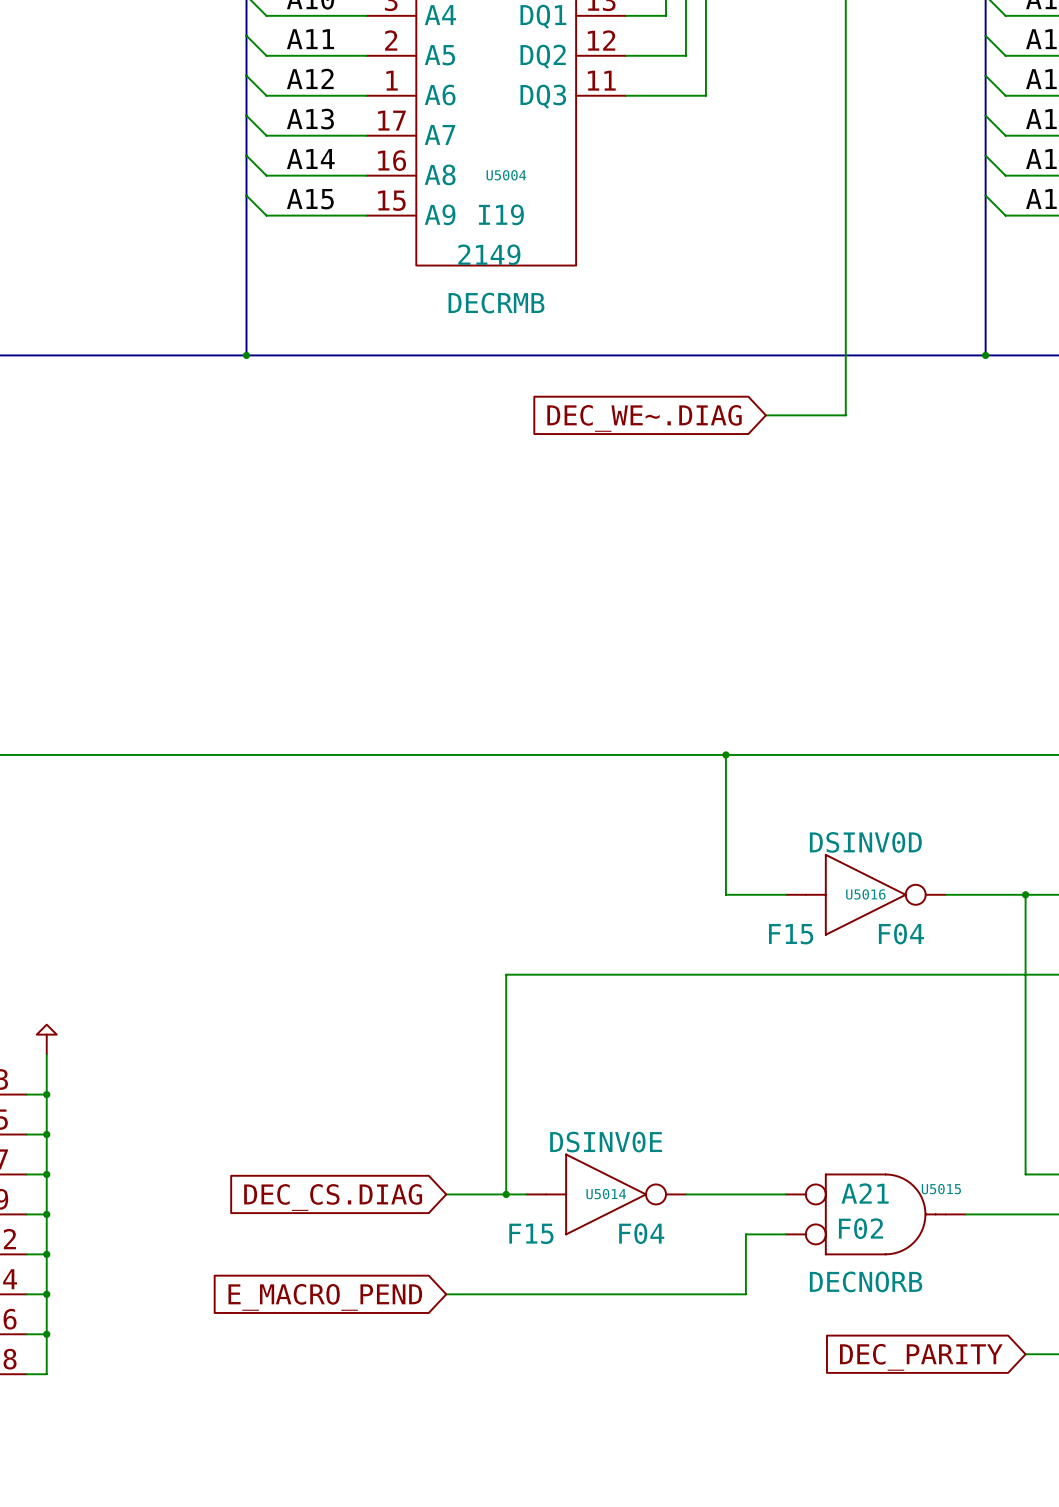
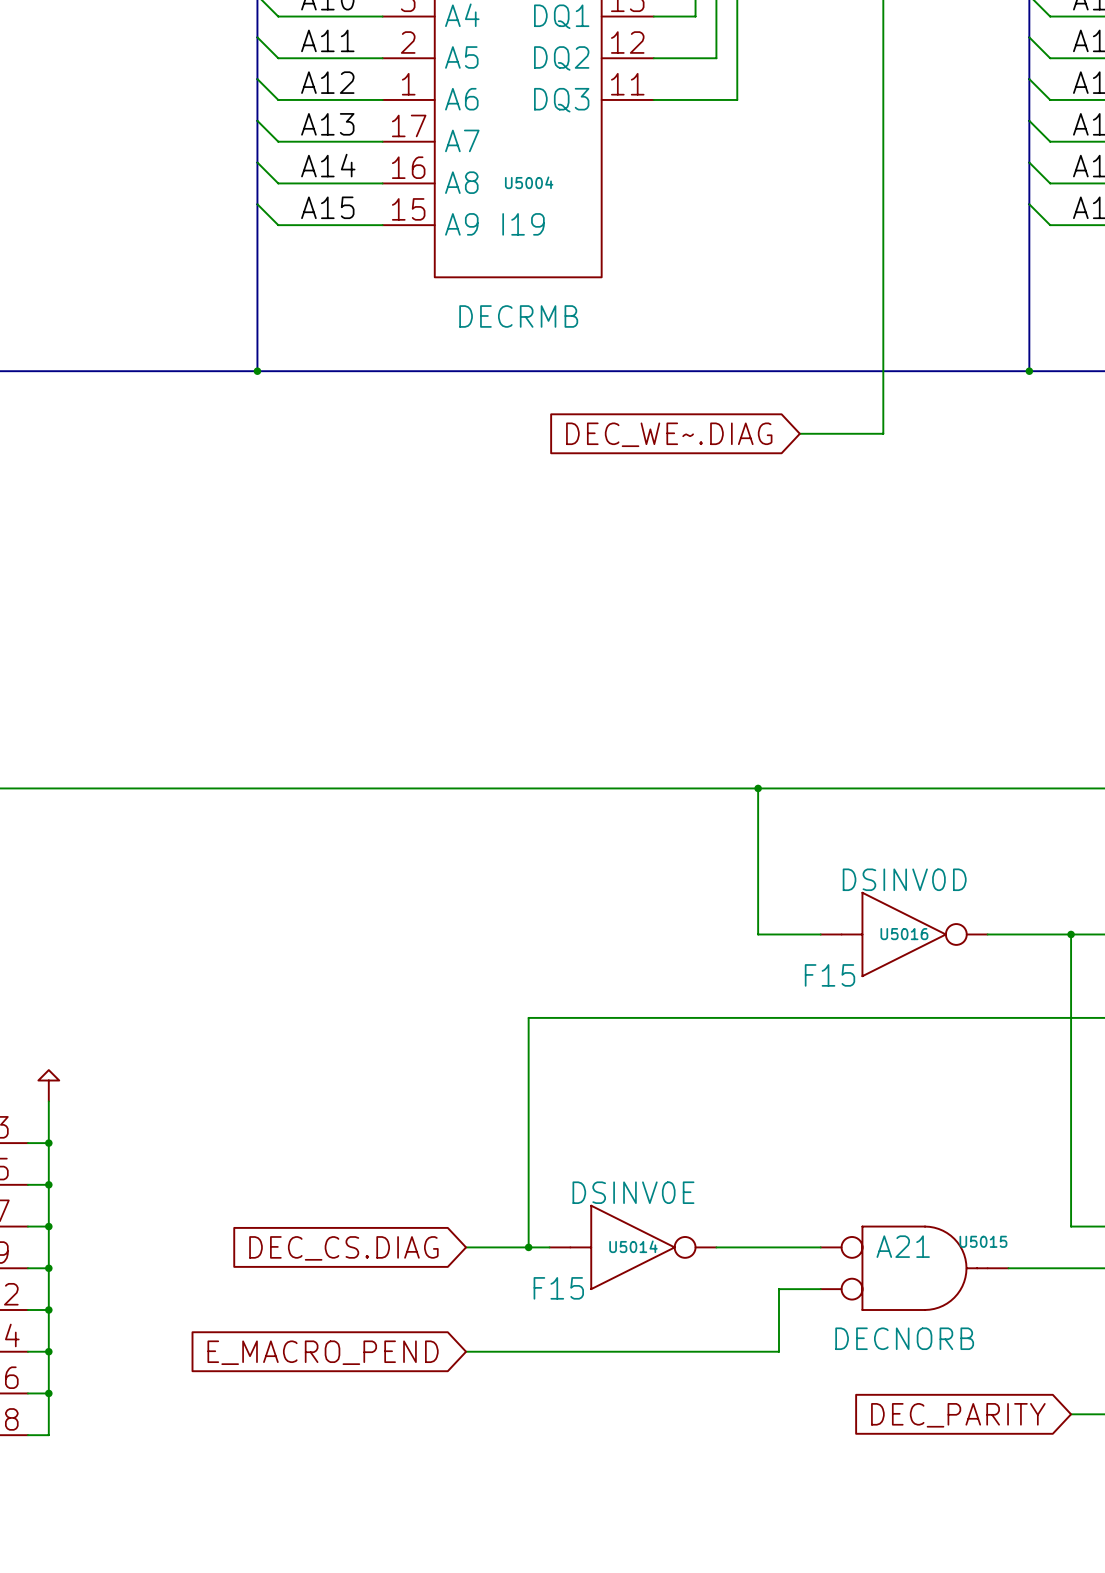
U5004 value: 2149 (489, 254) -> none
U5016 value: F04 (901, 934) -> none
U5015 value: F02 (860, 1228) -> none
U5014 value: F04 (641, 1233) -> none

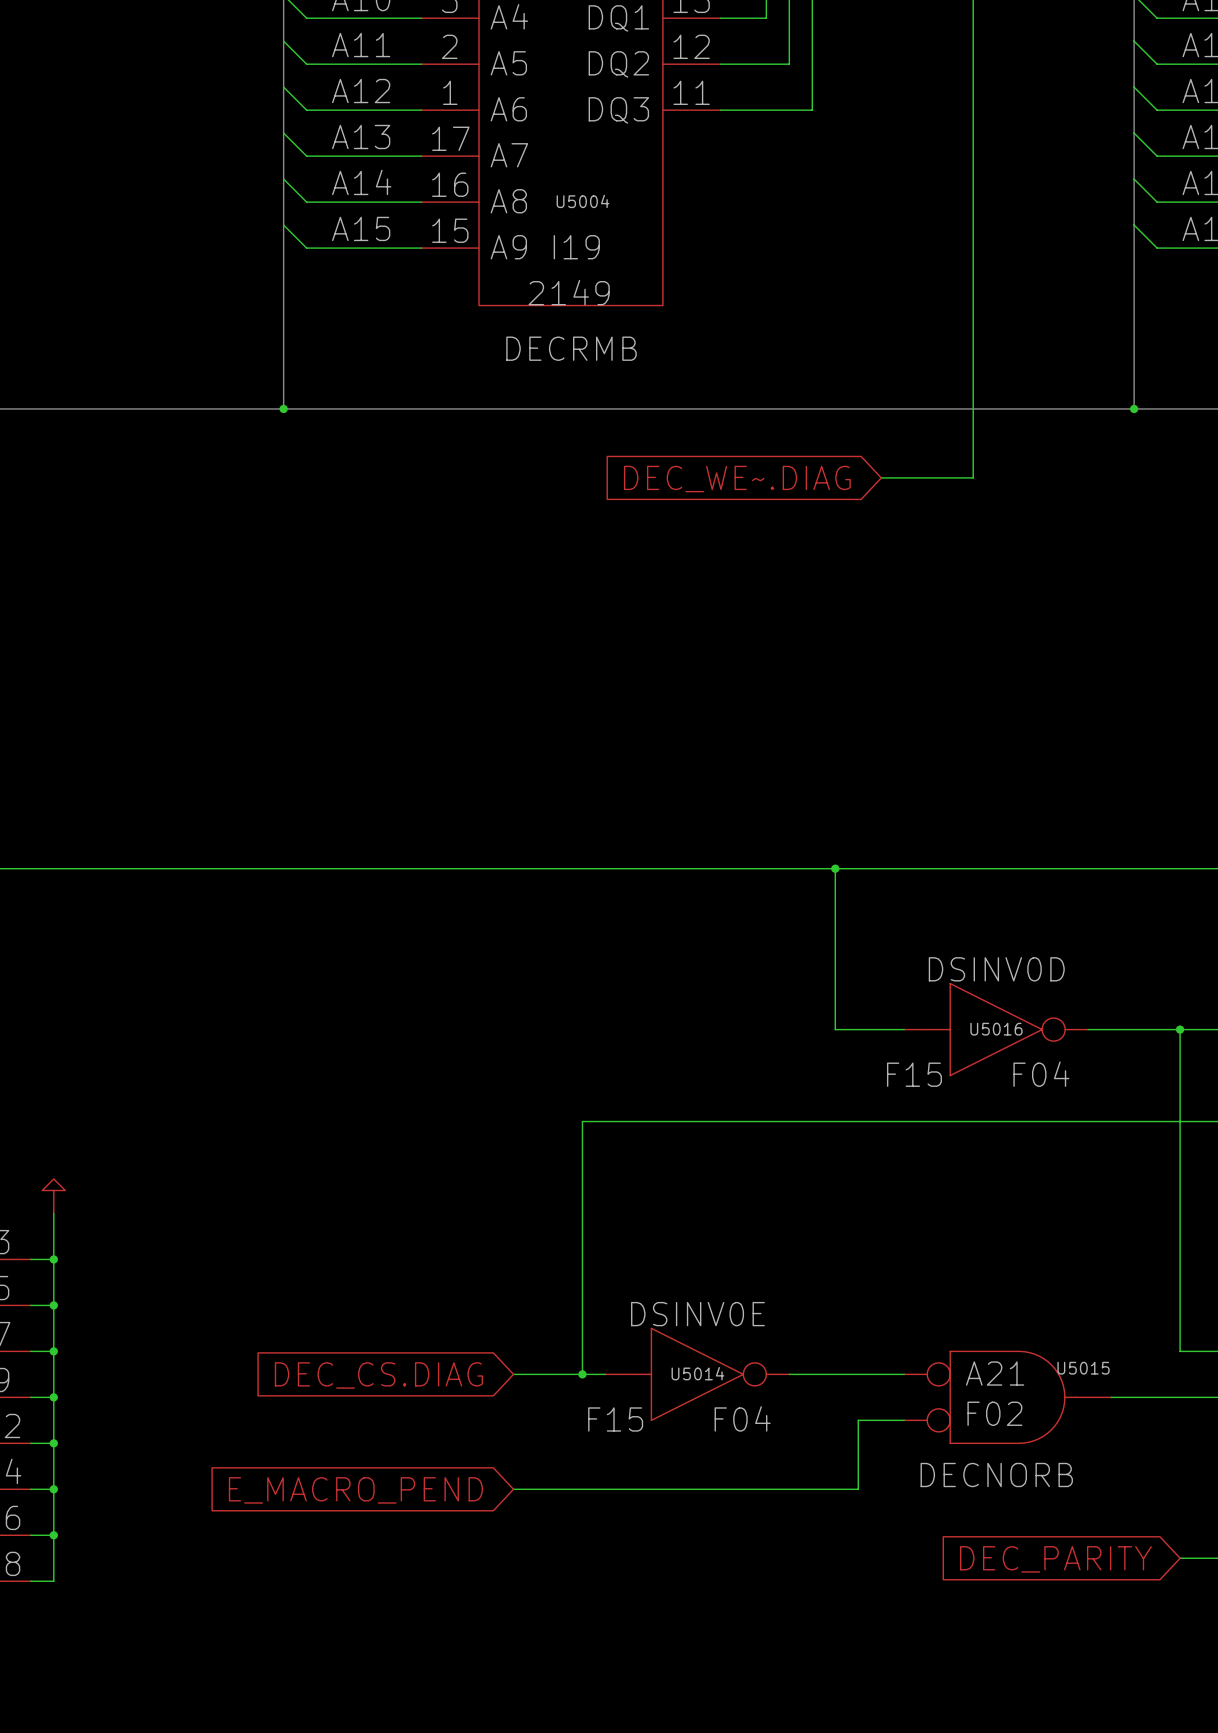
U5004 value: none -> 2149 (569, 292)
U5016 value: none -> F04 (1041, 1074)
U5015 value: none -> F02 (994, 1413)
U5014 value: none -> F04 (742, 1418)

